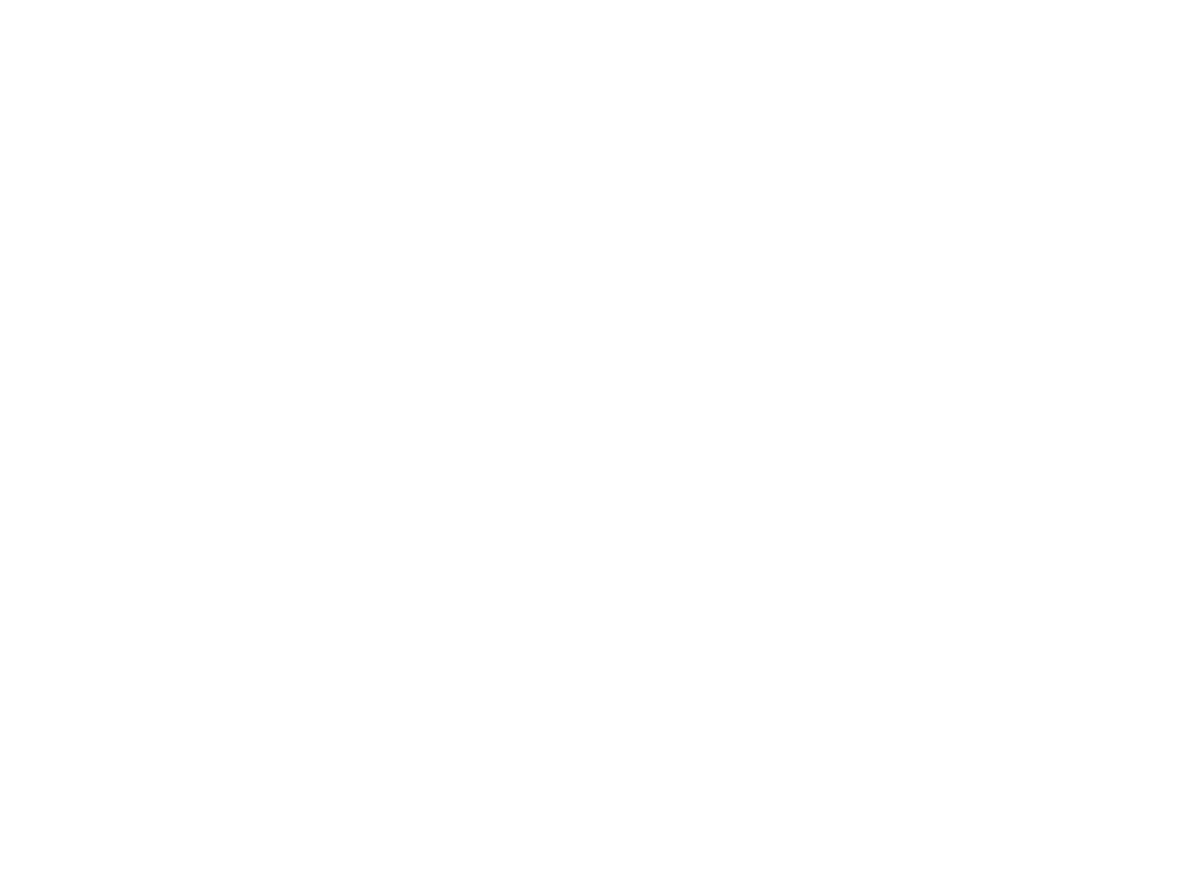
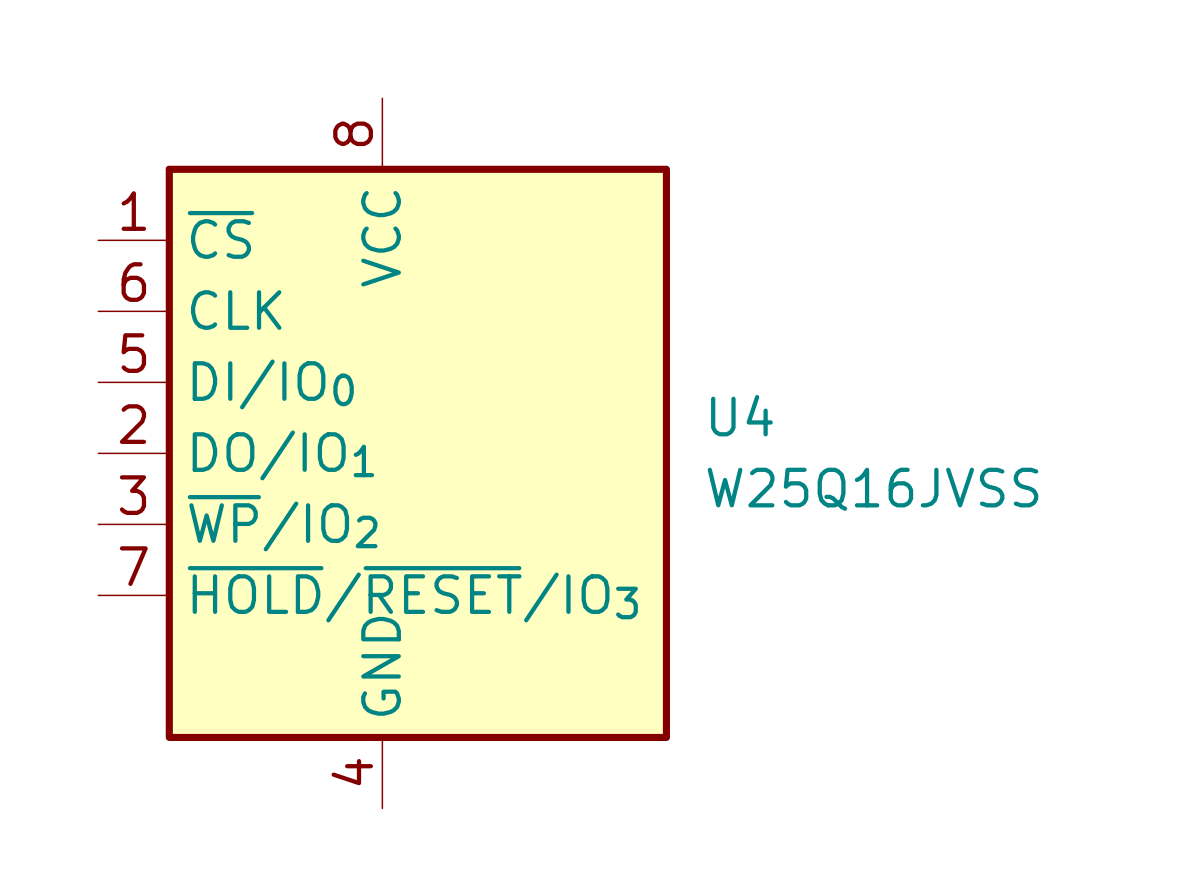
U4: none -> W25Q16JVSS (384, 453)

